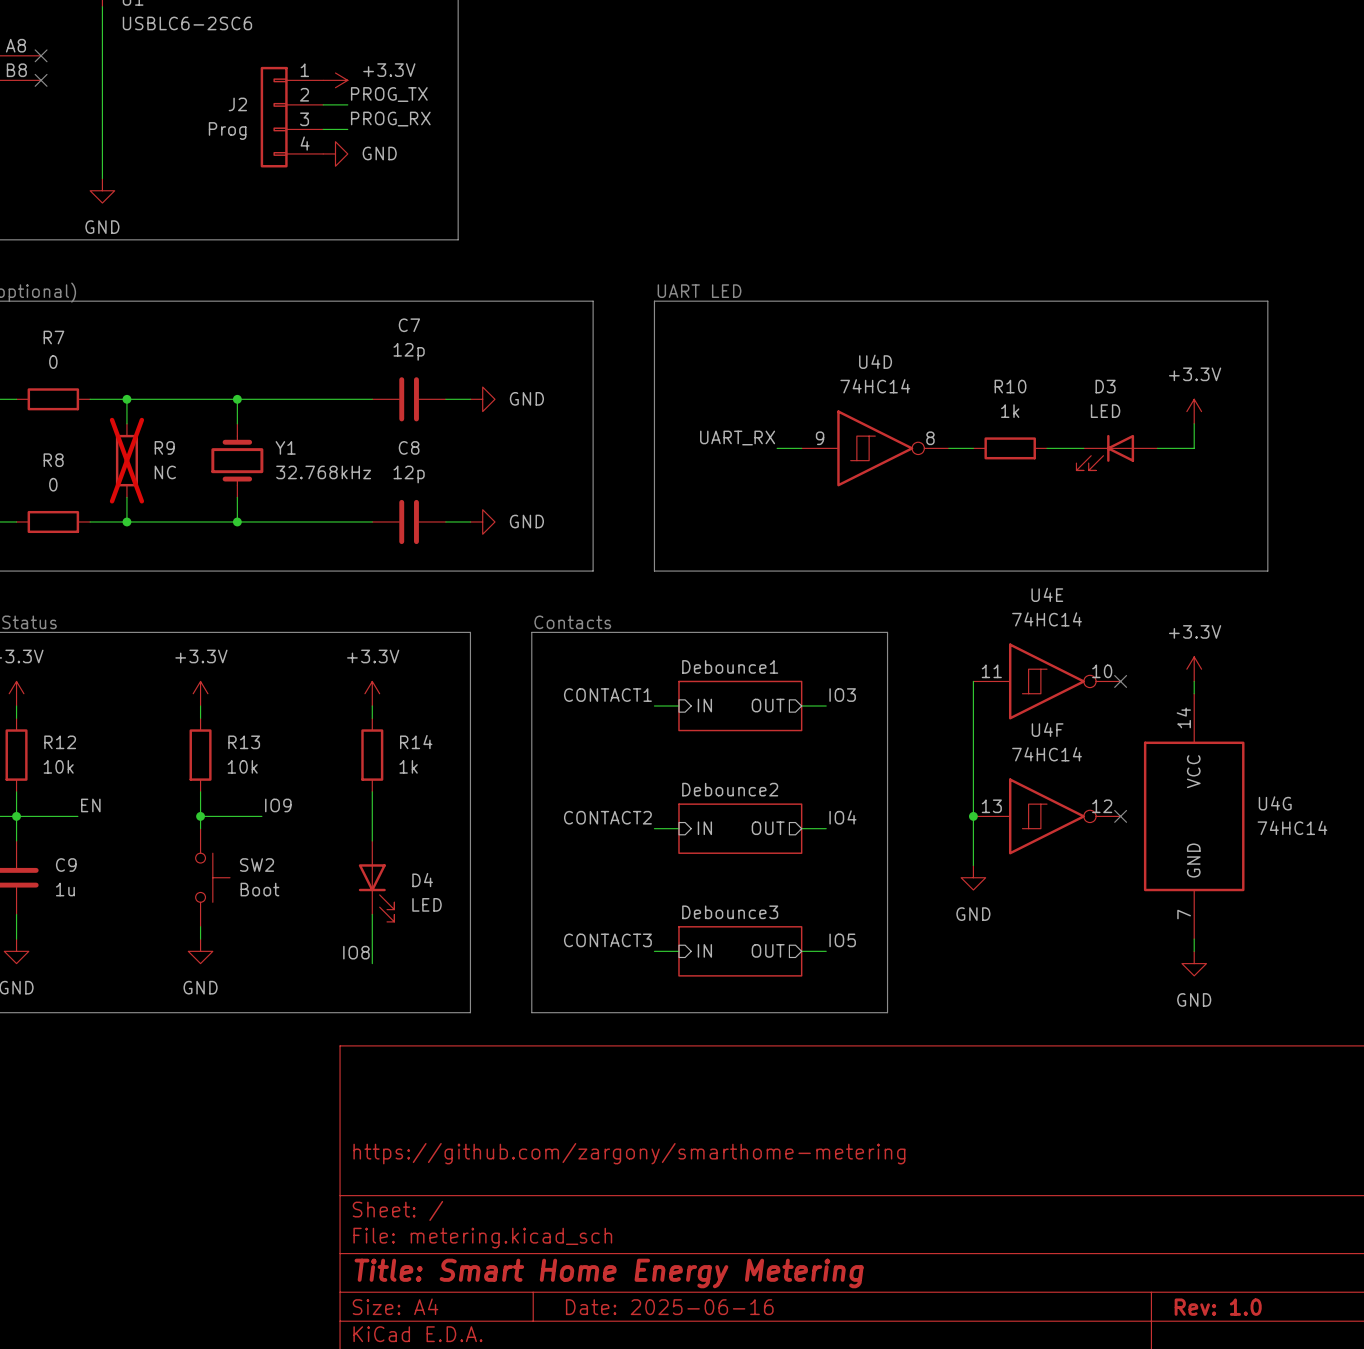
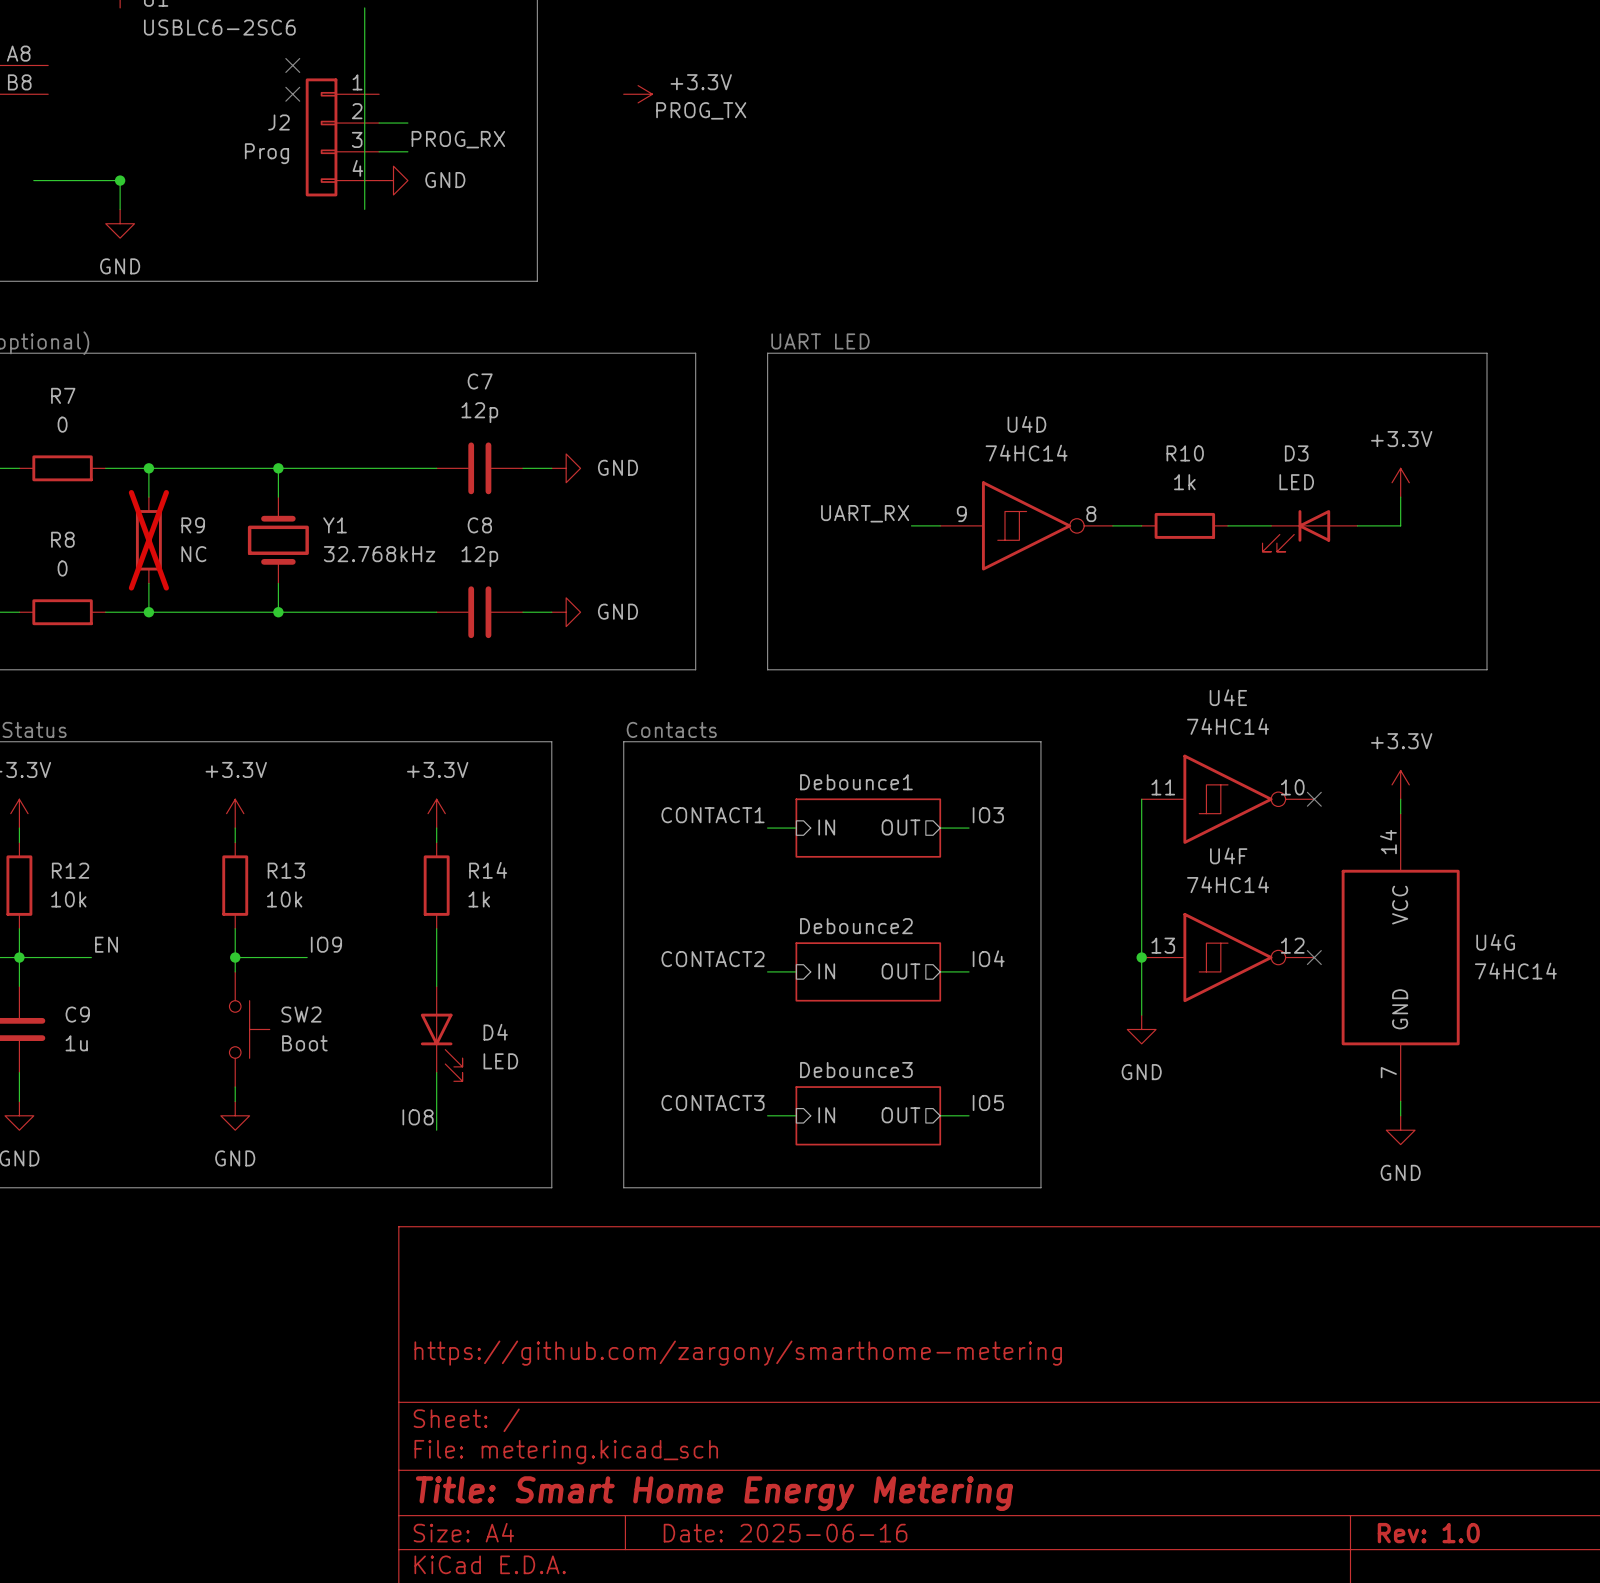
wire: (102, 6) (102, 153) -> (33, 180) (120, 180)
wire: none -> (364, 7) (364, 209)
no-connect mark: (41, 55) -> none
no-connect mark: none -> (292, 65)
no-connect mark: (41, 80) -> none
no-connect mark: none -> (292, 94)
power symbol position: +3.3V (335, 80) -> +3.3V (638, 94)
label position: PROG_TX (389, 94) -> PROG_TX (701, 110)
junction: none -> (120, 180)

